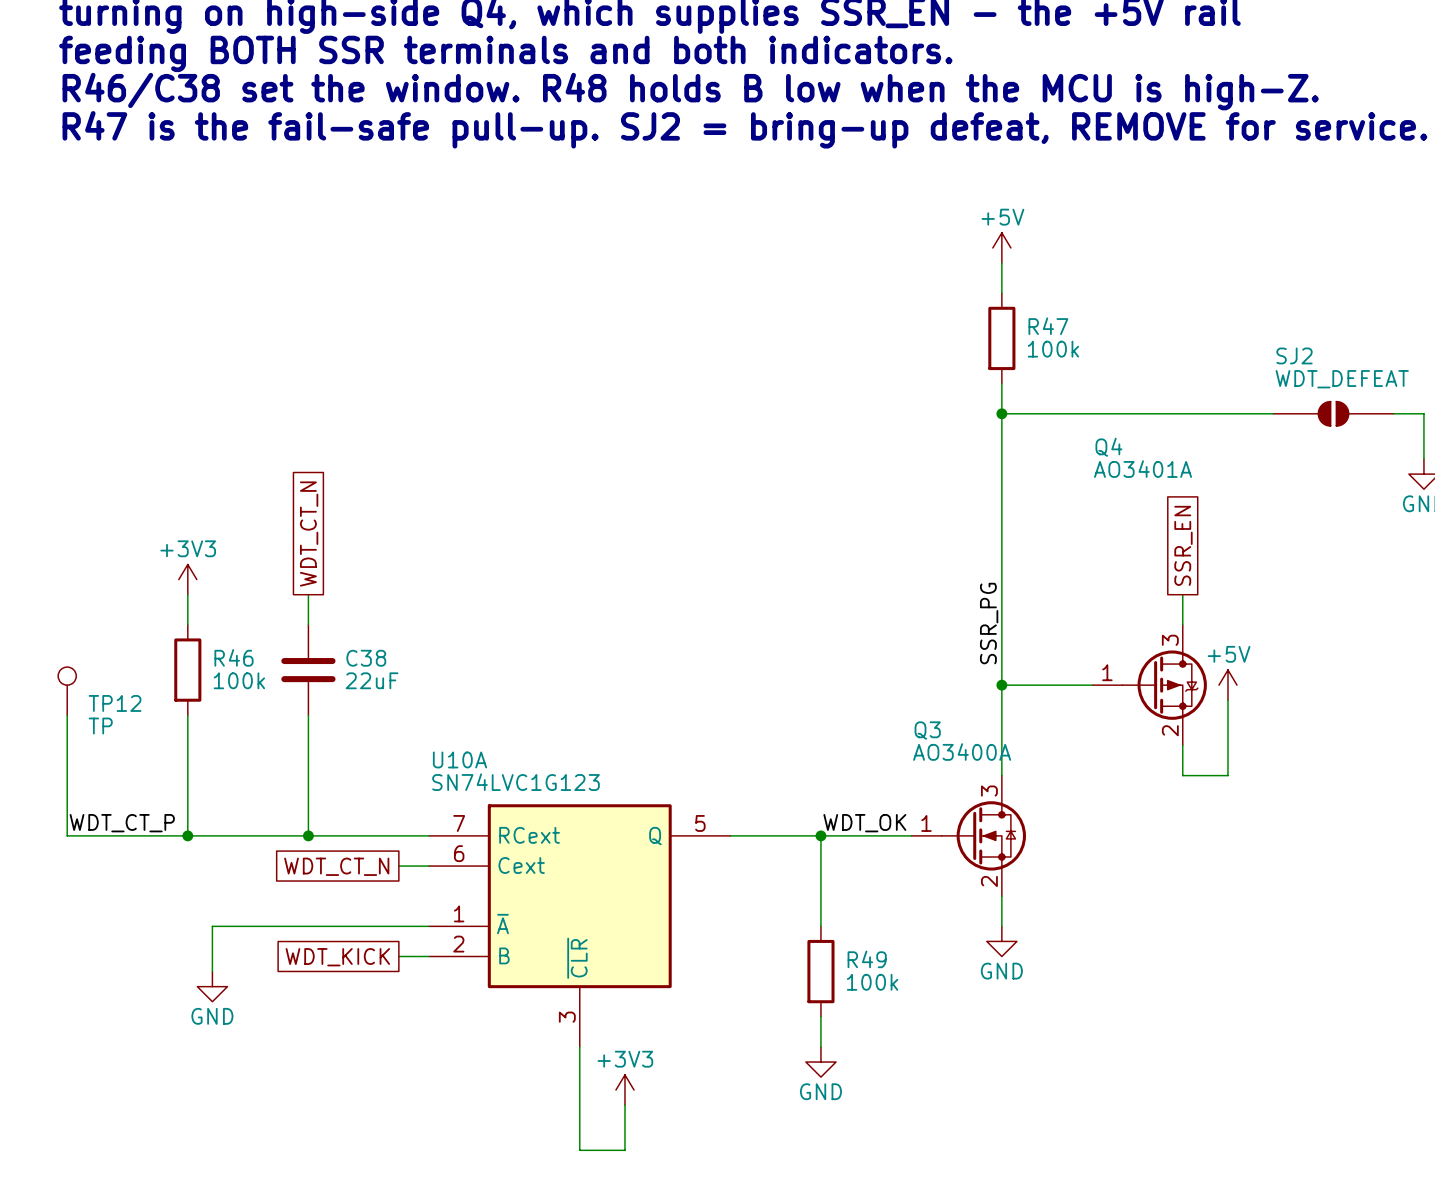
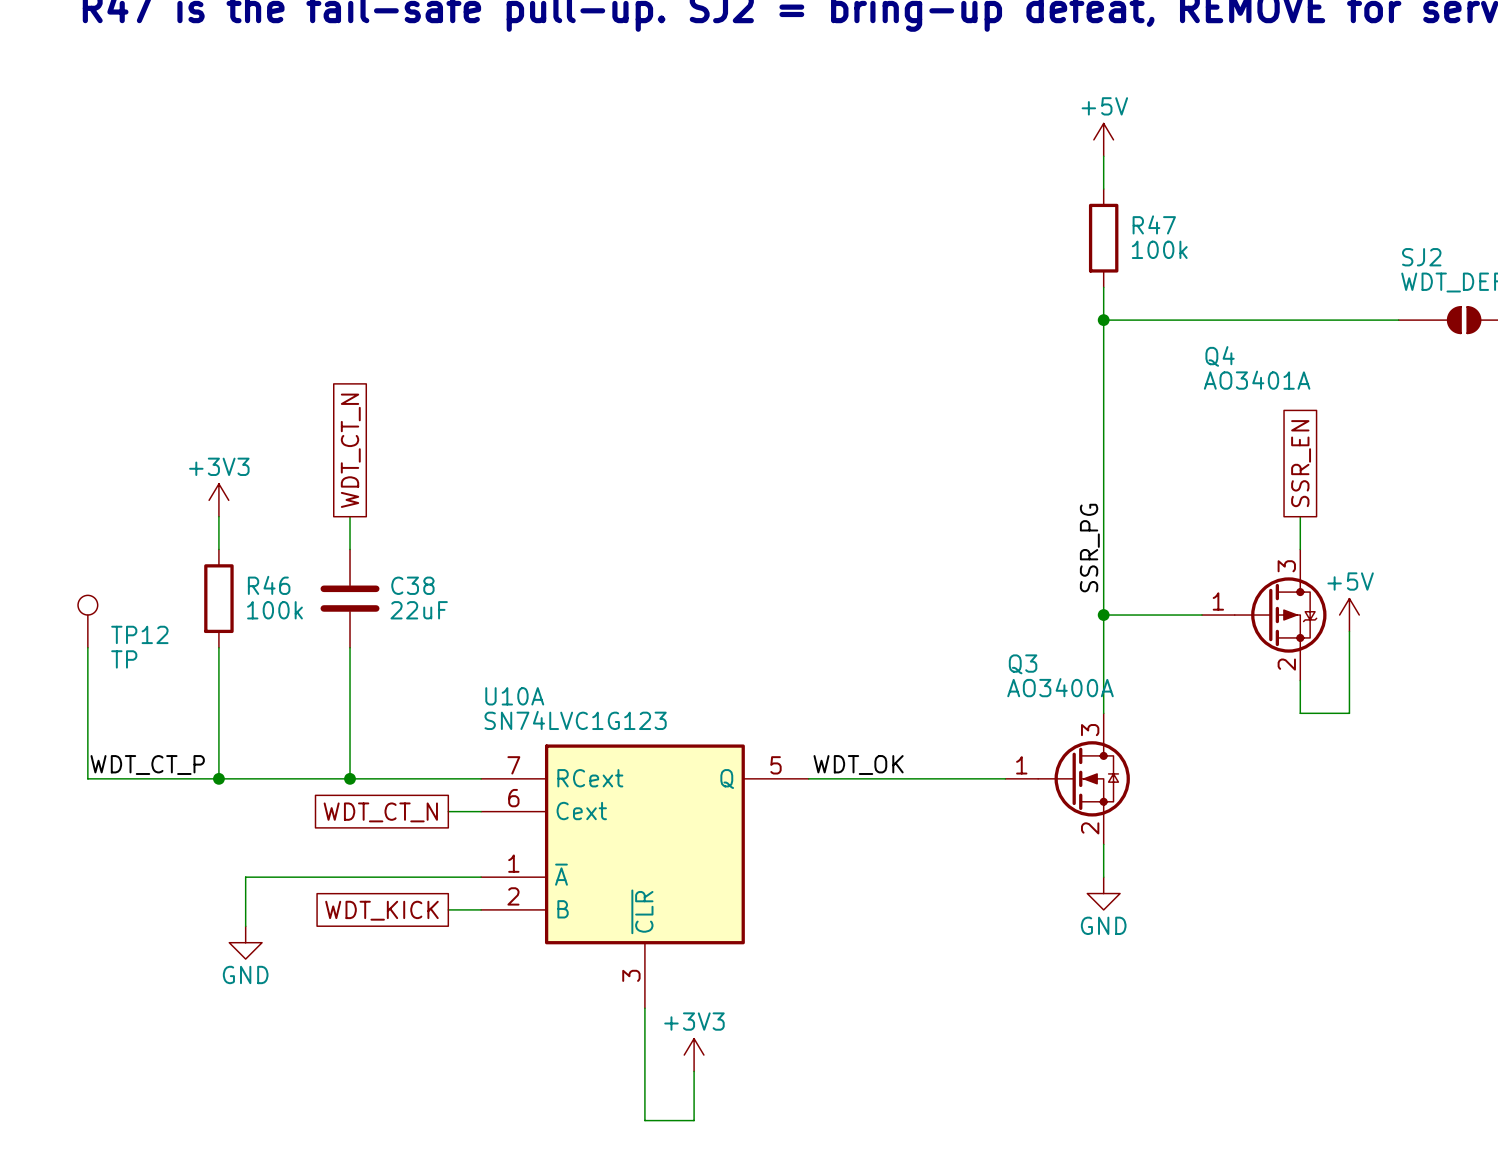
label position: WDT_OK (864, 823) -> WDT_OK (858, 765)
wire: (820, 835) (820, 926) -> none
junction: (820, 835) -> none
R49: 100k (820, 971) -> none
wire: (820, 1016) (820, 1046) -> none
power symbol: GND (820, 1062) -> none

